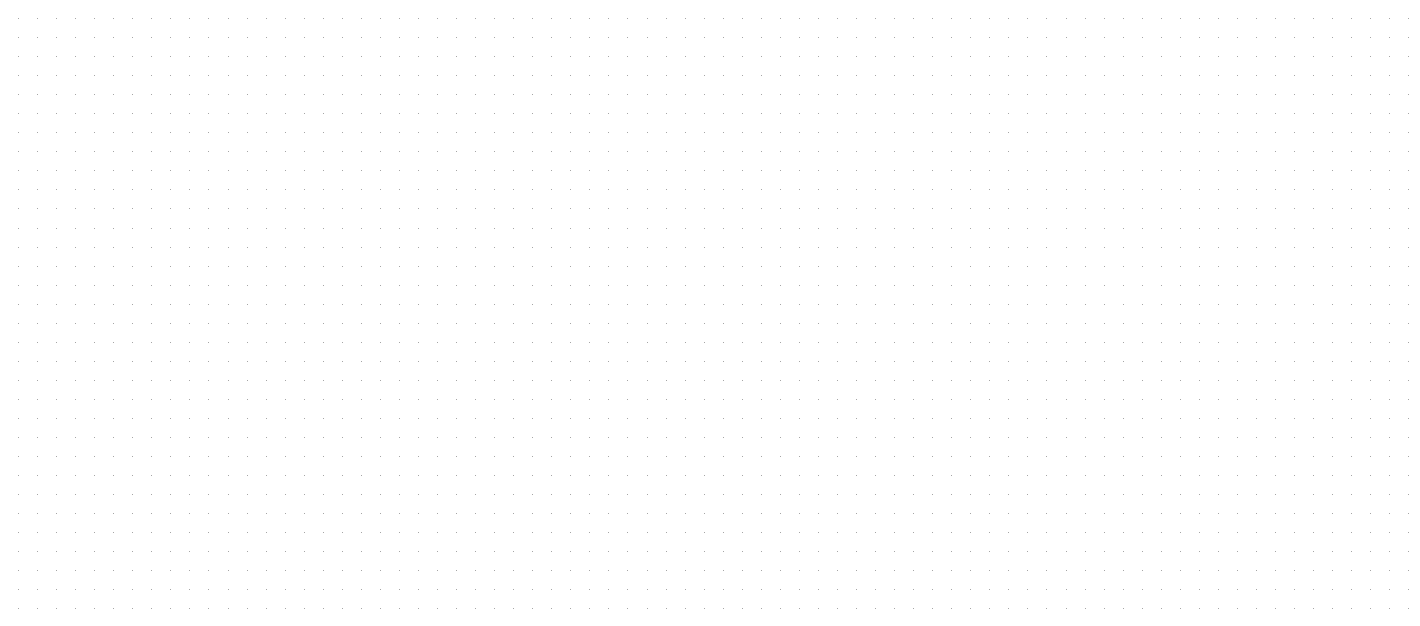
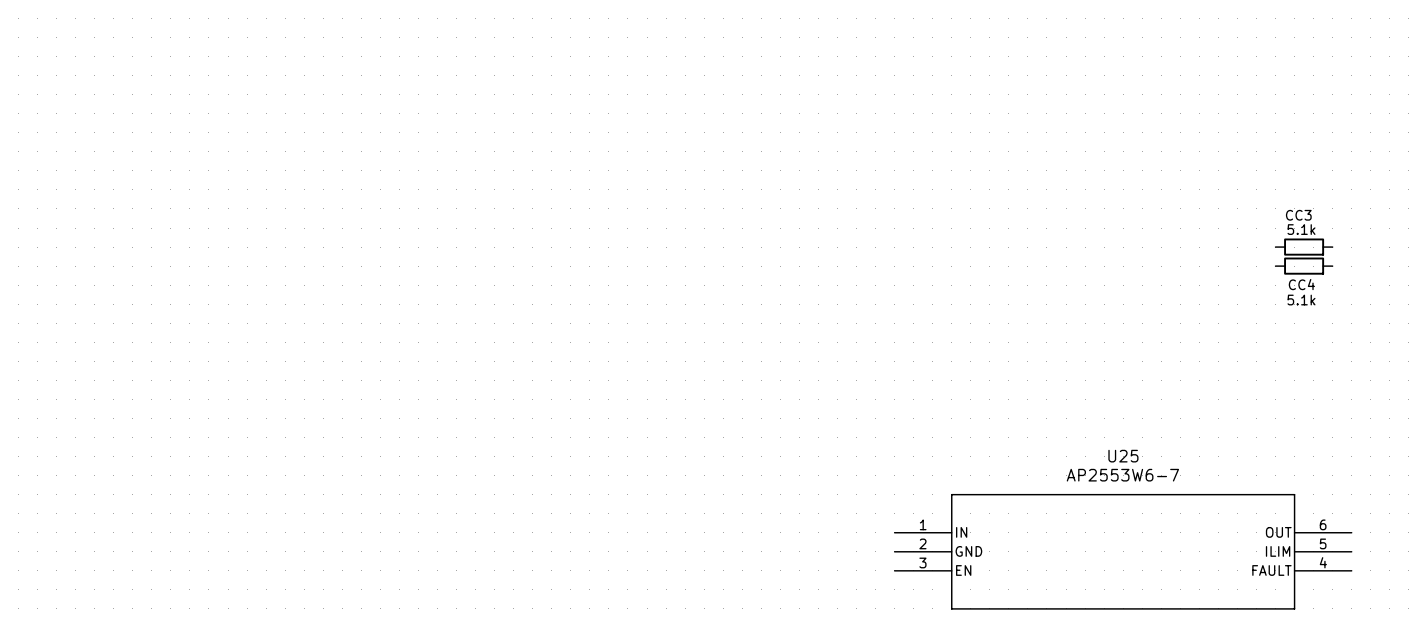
CC3: none -> 5.1k (1304, 247)
CC4: none -> 5.1k (1304, 266)
U25: none -> AP2553W6-7 (1123, 551)

